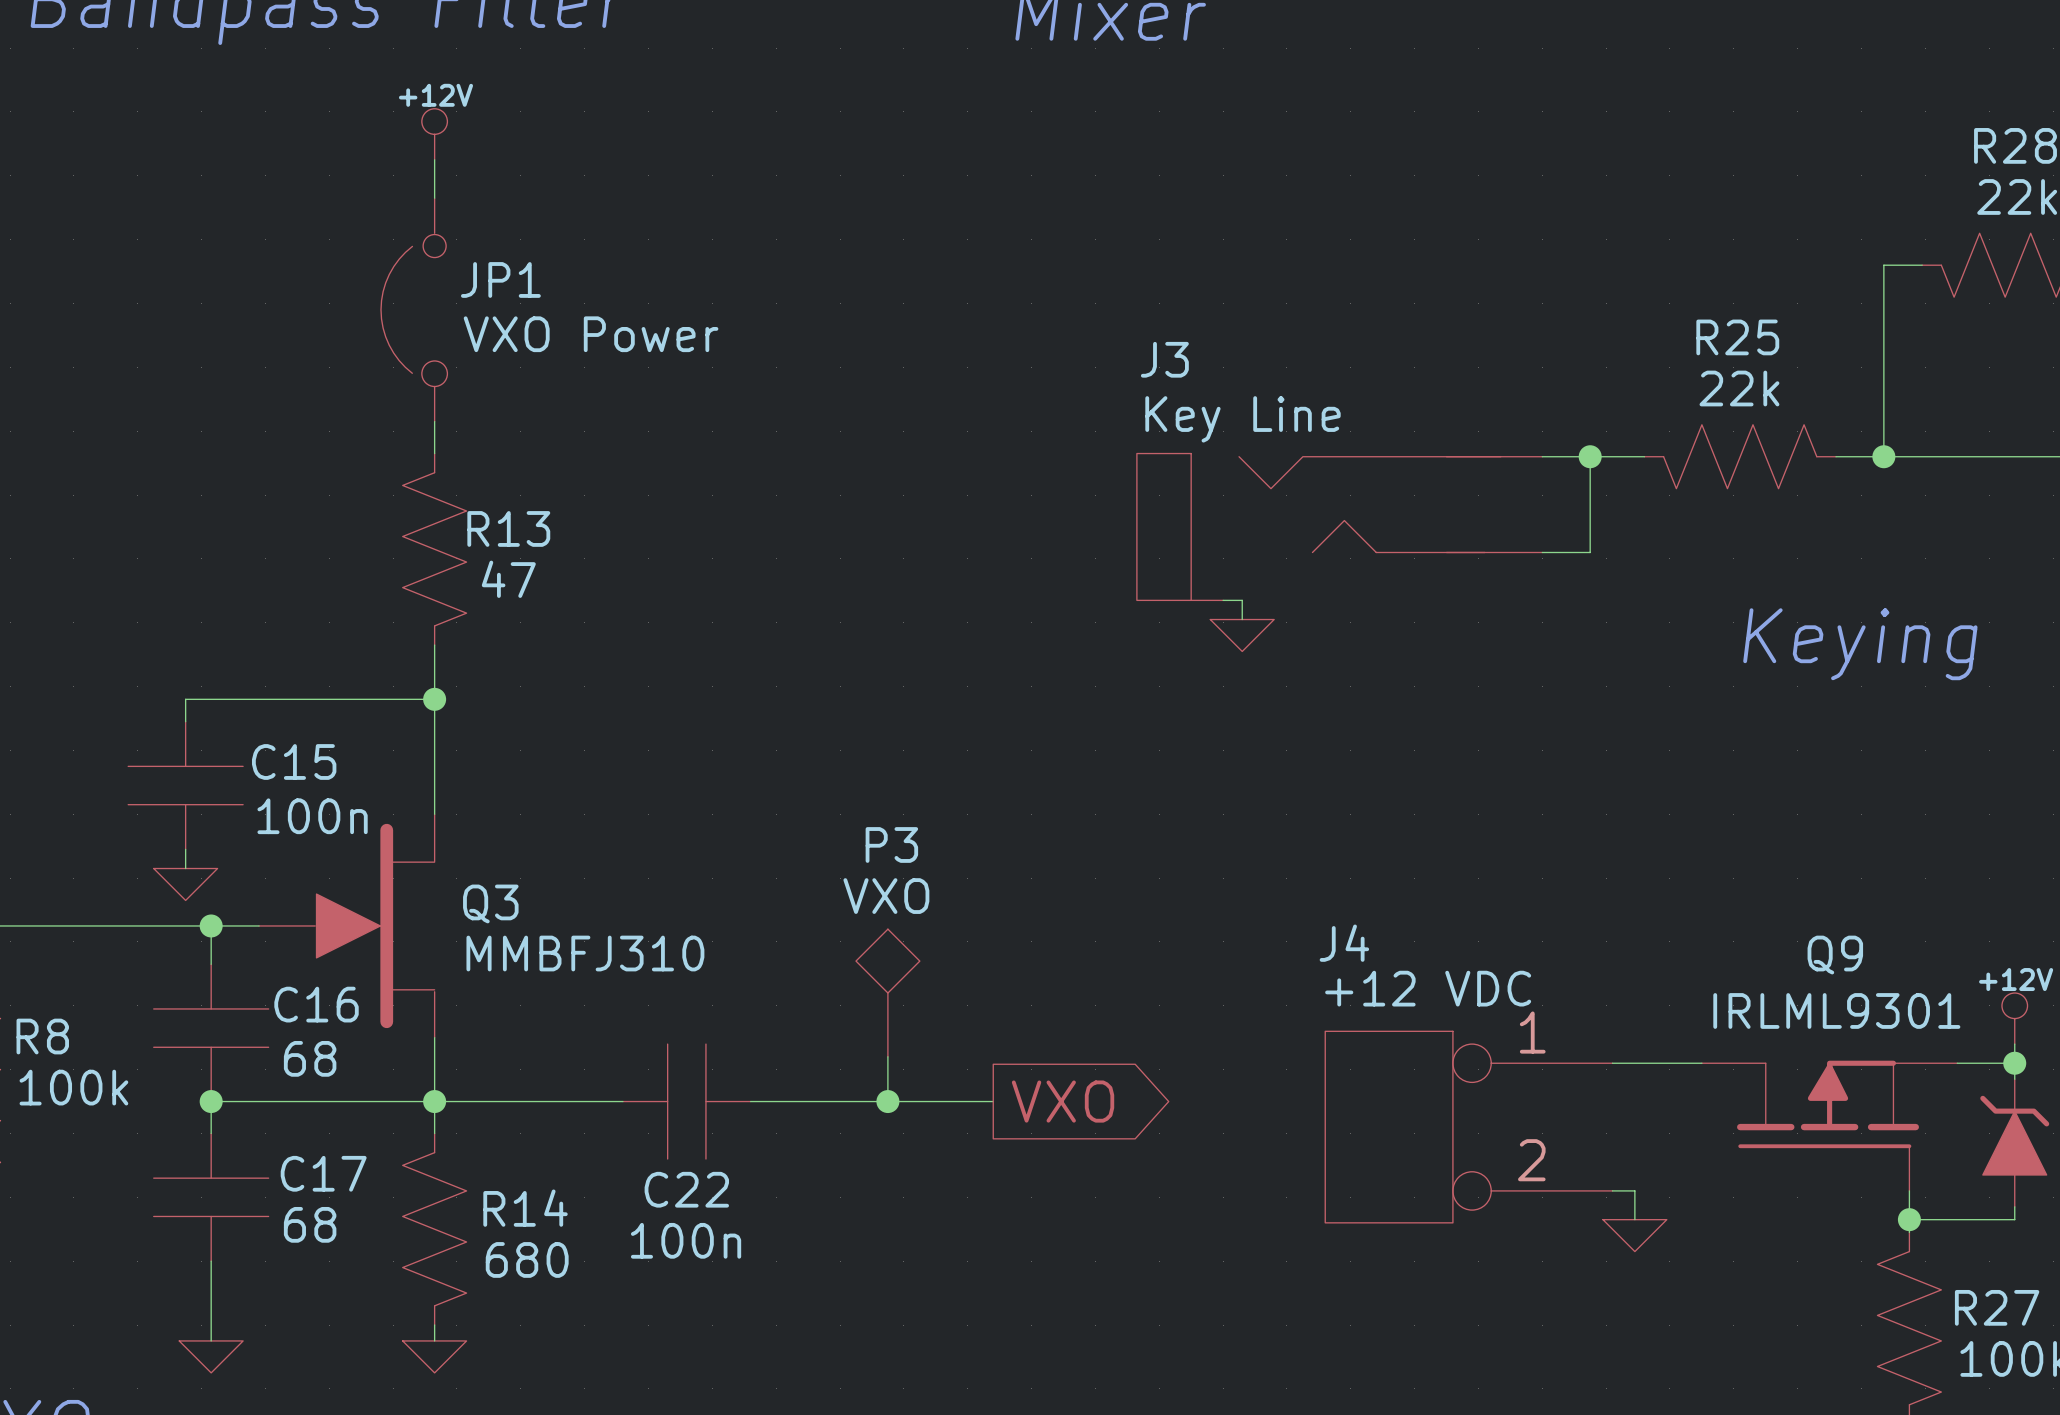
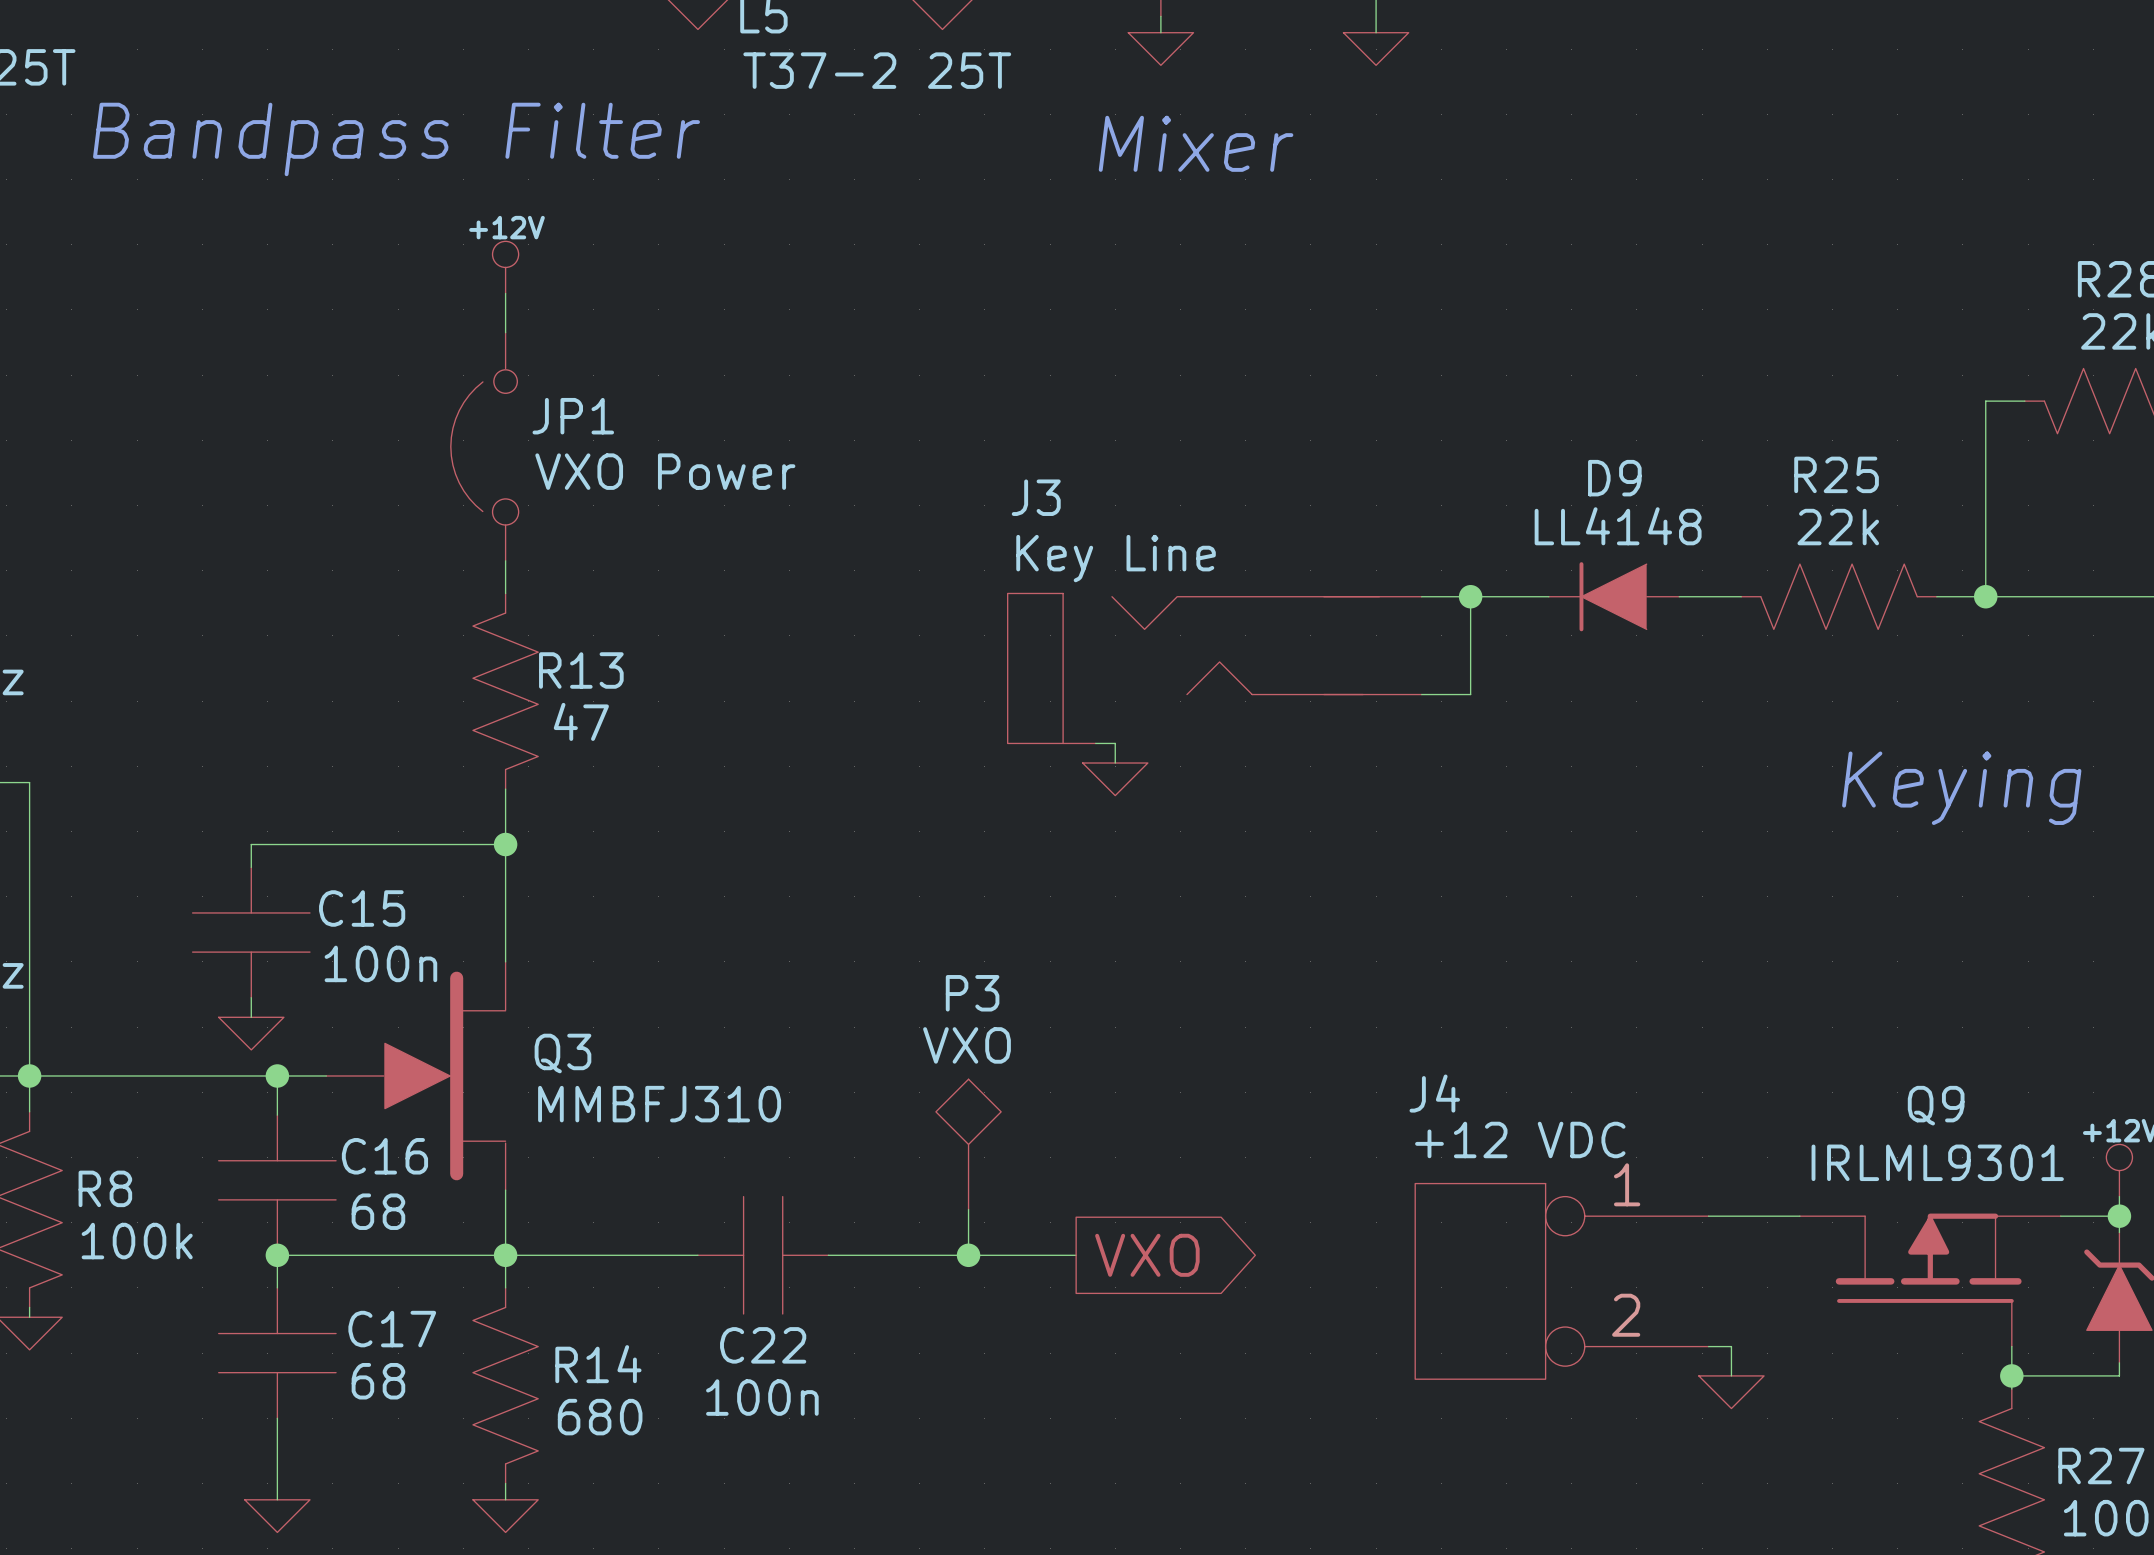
junction: none -> (1470, 596)
D9: none -> LL4148 (1614, 596)
wire: (1590, 456) (1590, 552) (1542, 552) -> (1470, 596) (1470, 694) (1421, 694)
junction: (1590, 456) -> none
J3 position: (1339, 526) -> (1214, 668)
wire: (1223, 600) (1242, 600) (1242, 619) -> (1095, 743) (1115, 743) (1115, 763)
power symbol position: (1242, 635) -> (1115, 779)

